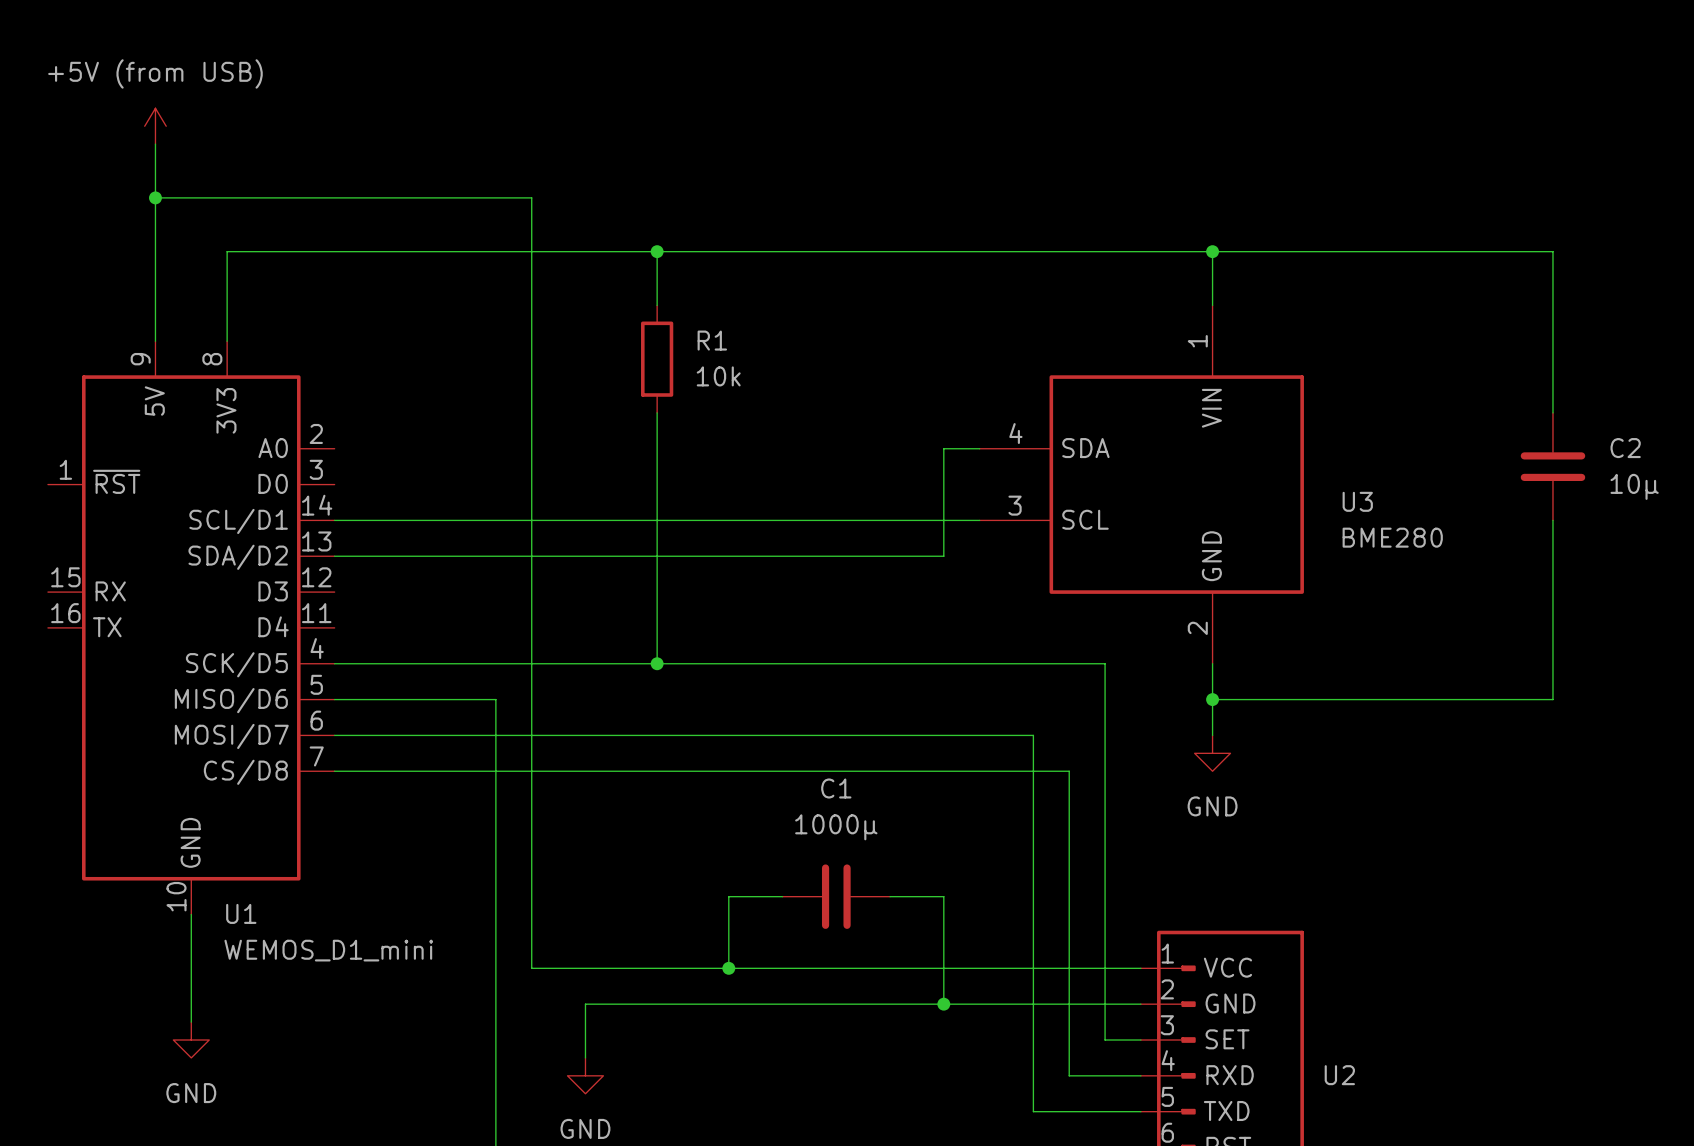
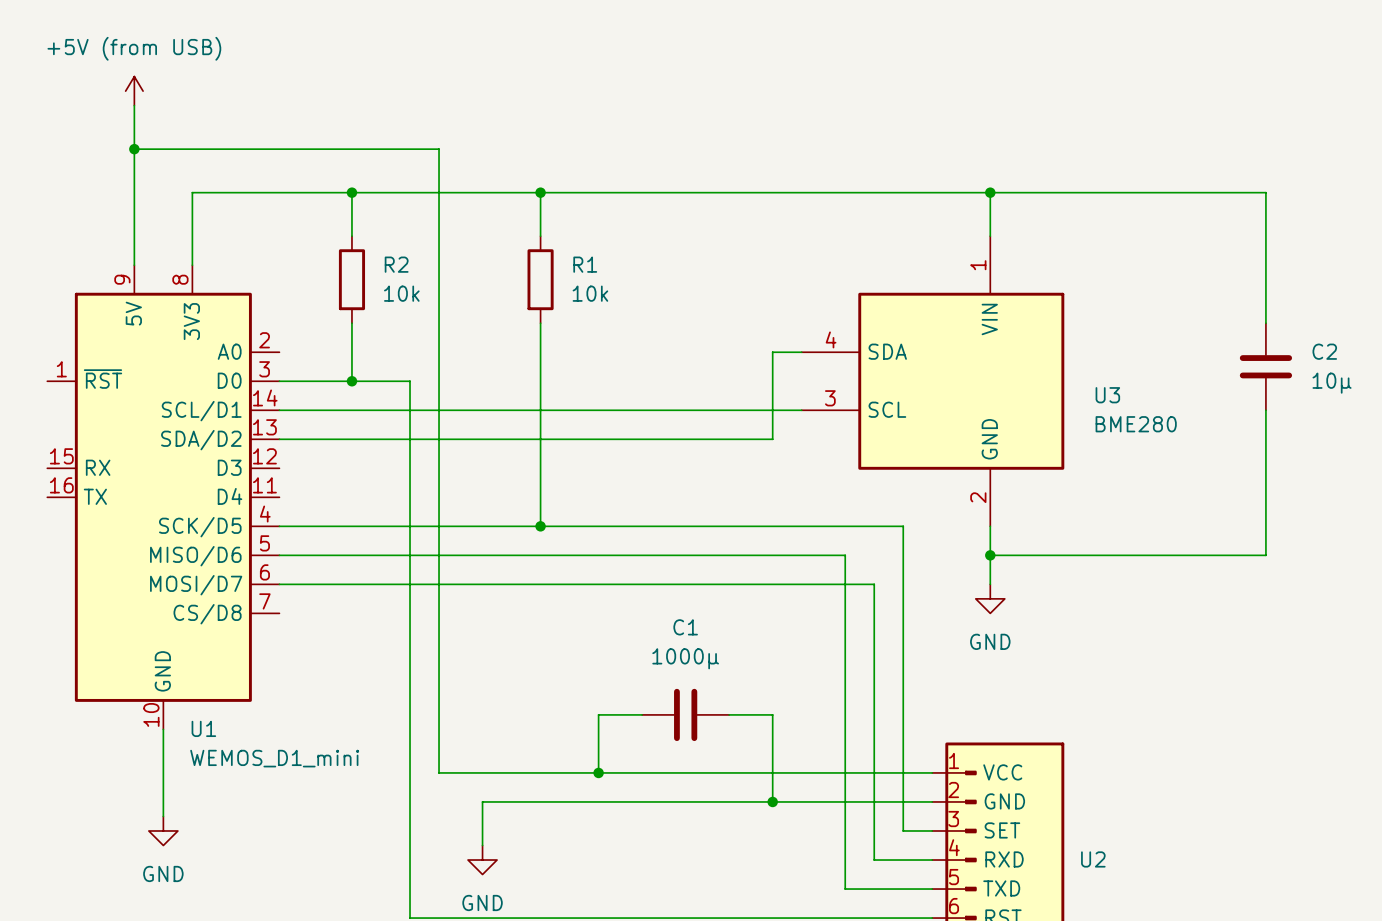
wire: none -> (351, 192) (351, 236)
junction: none -> (351, 192)
R2: none -> 10k (351, 279)
wire: none -> (351, 323) (351, 381)
junction: none -> (351, 381)
wire: (334, 771) (1069, 771) -> (279, 381) (410, 381) (410, 555) (845, 555) (845, 584) (874, 584) (874, 613)

